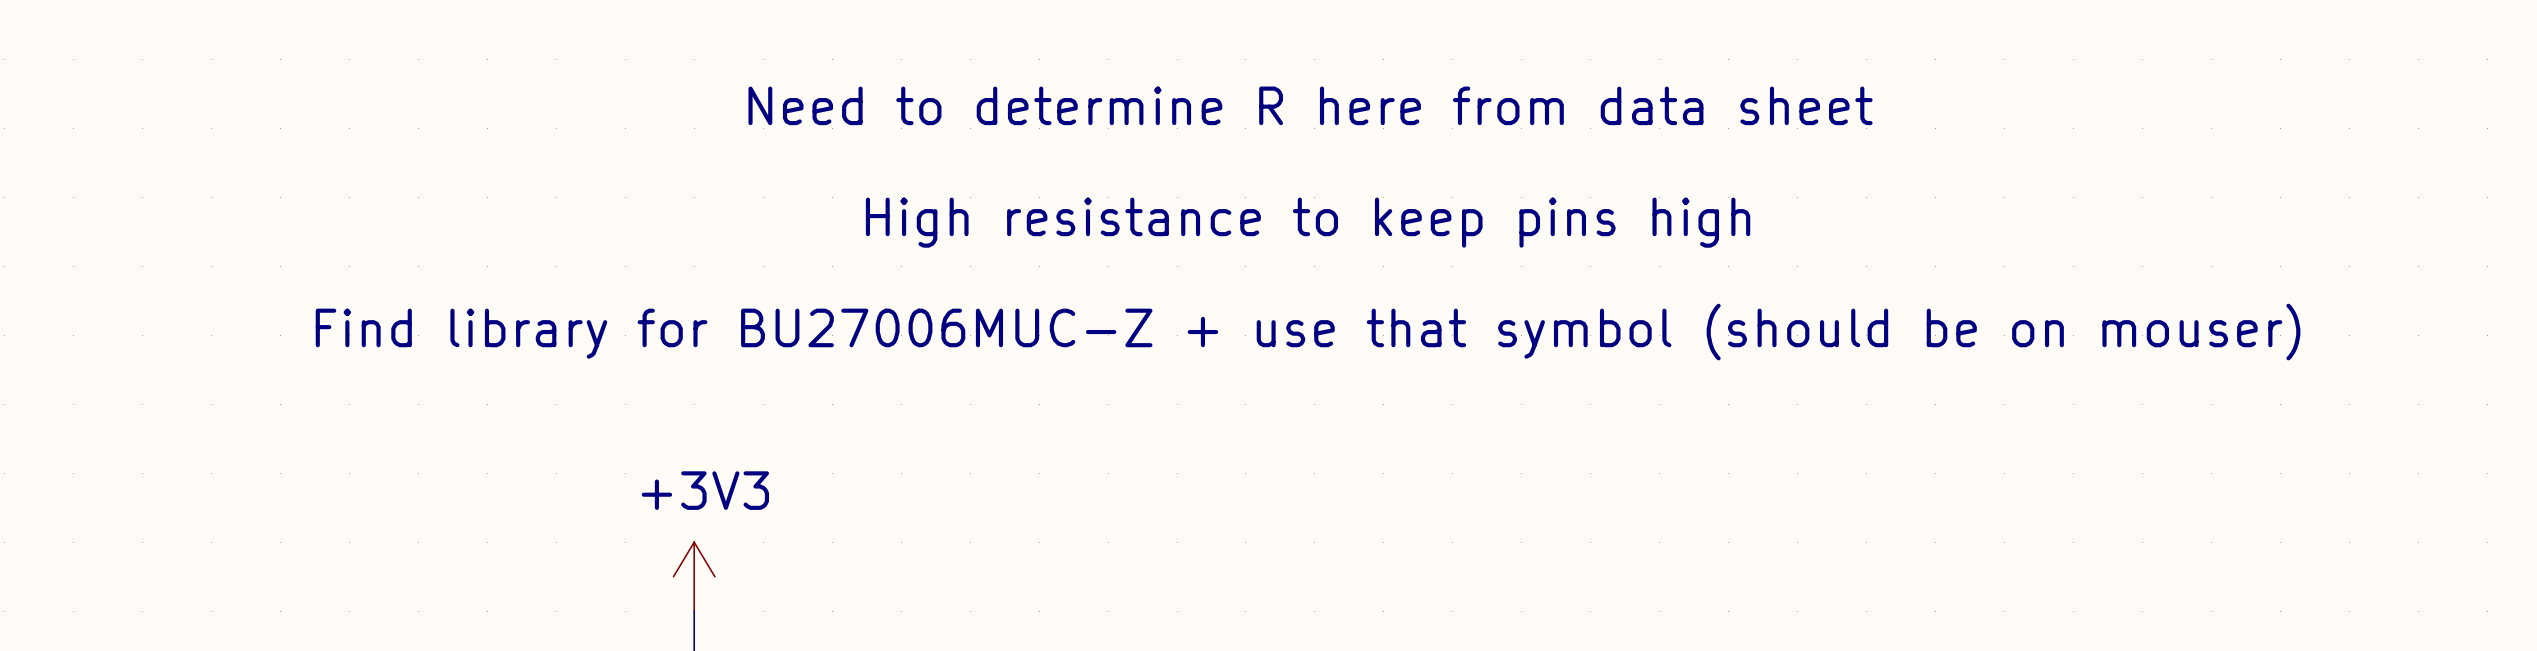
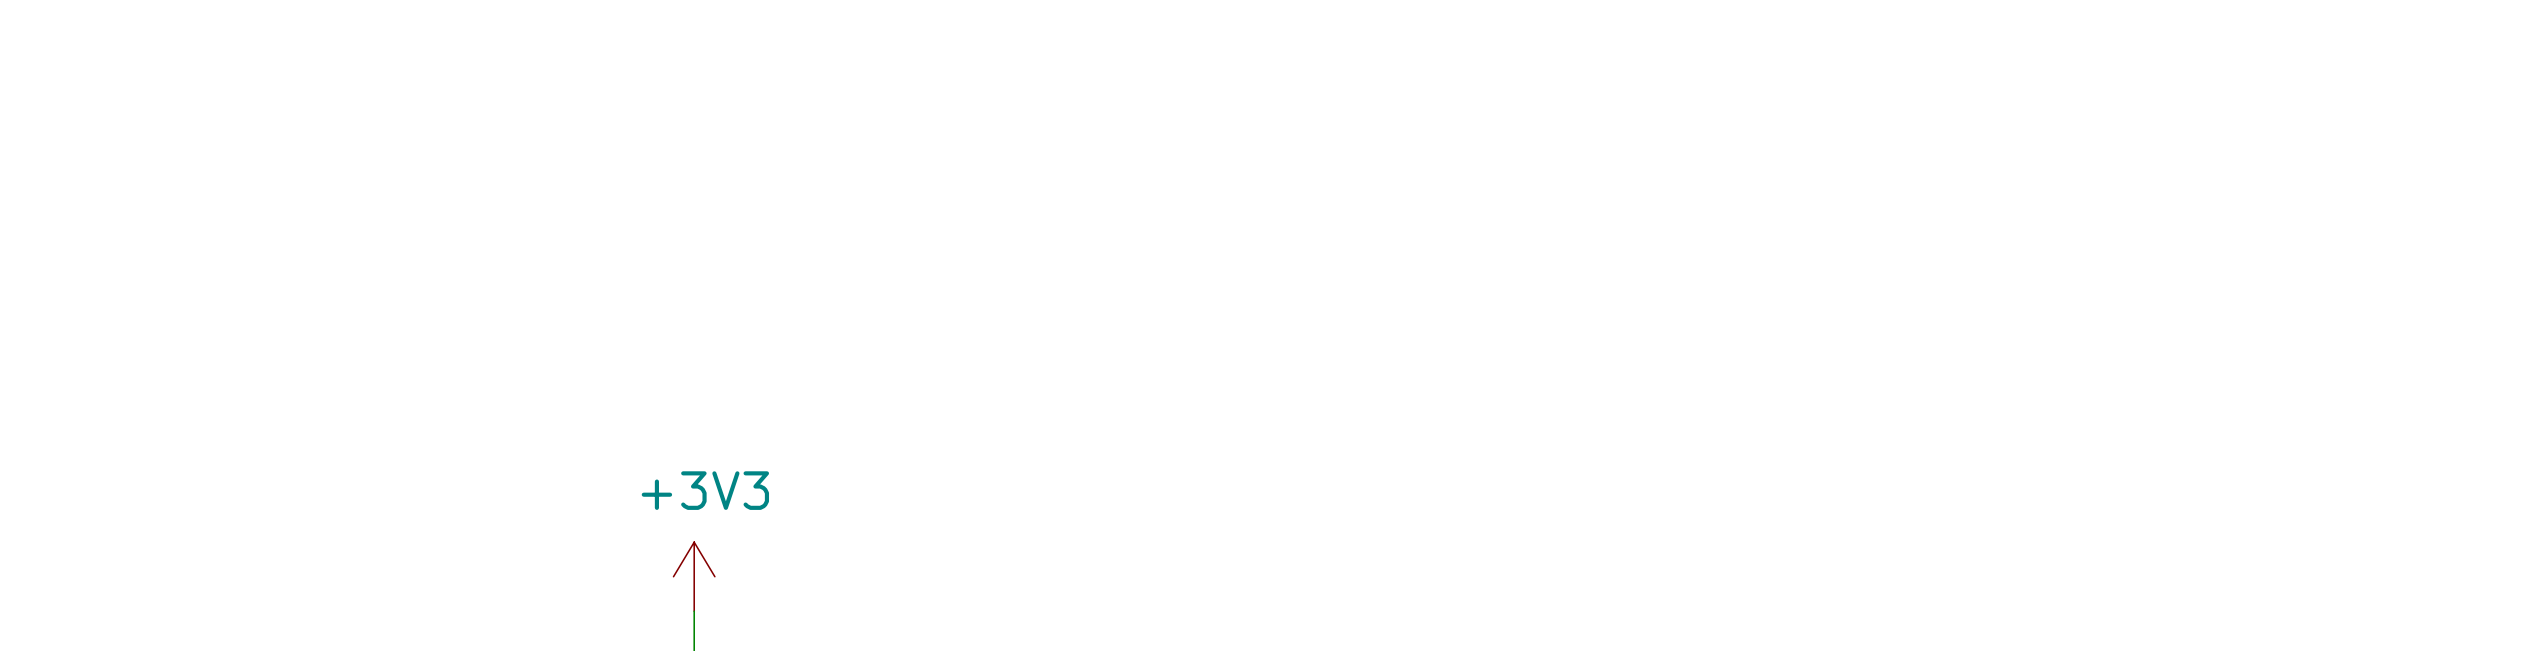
text: Need to determine R here from data sheet (1310, 105) -> none
text: High resistance to keep pins high (1308, 222) -> none
text: Find library for BU27006MUC-Z + use that symbol (should be on mouser) (1308, 332) -> none

